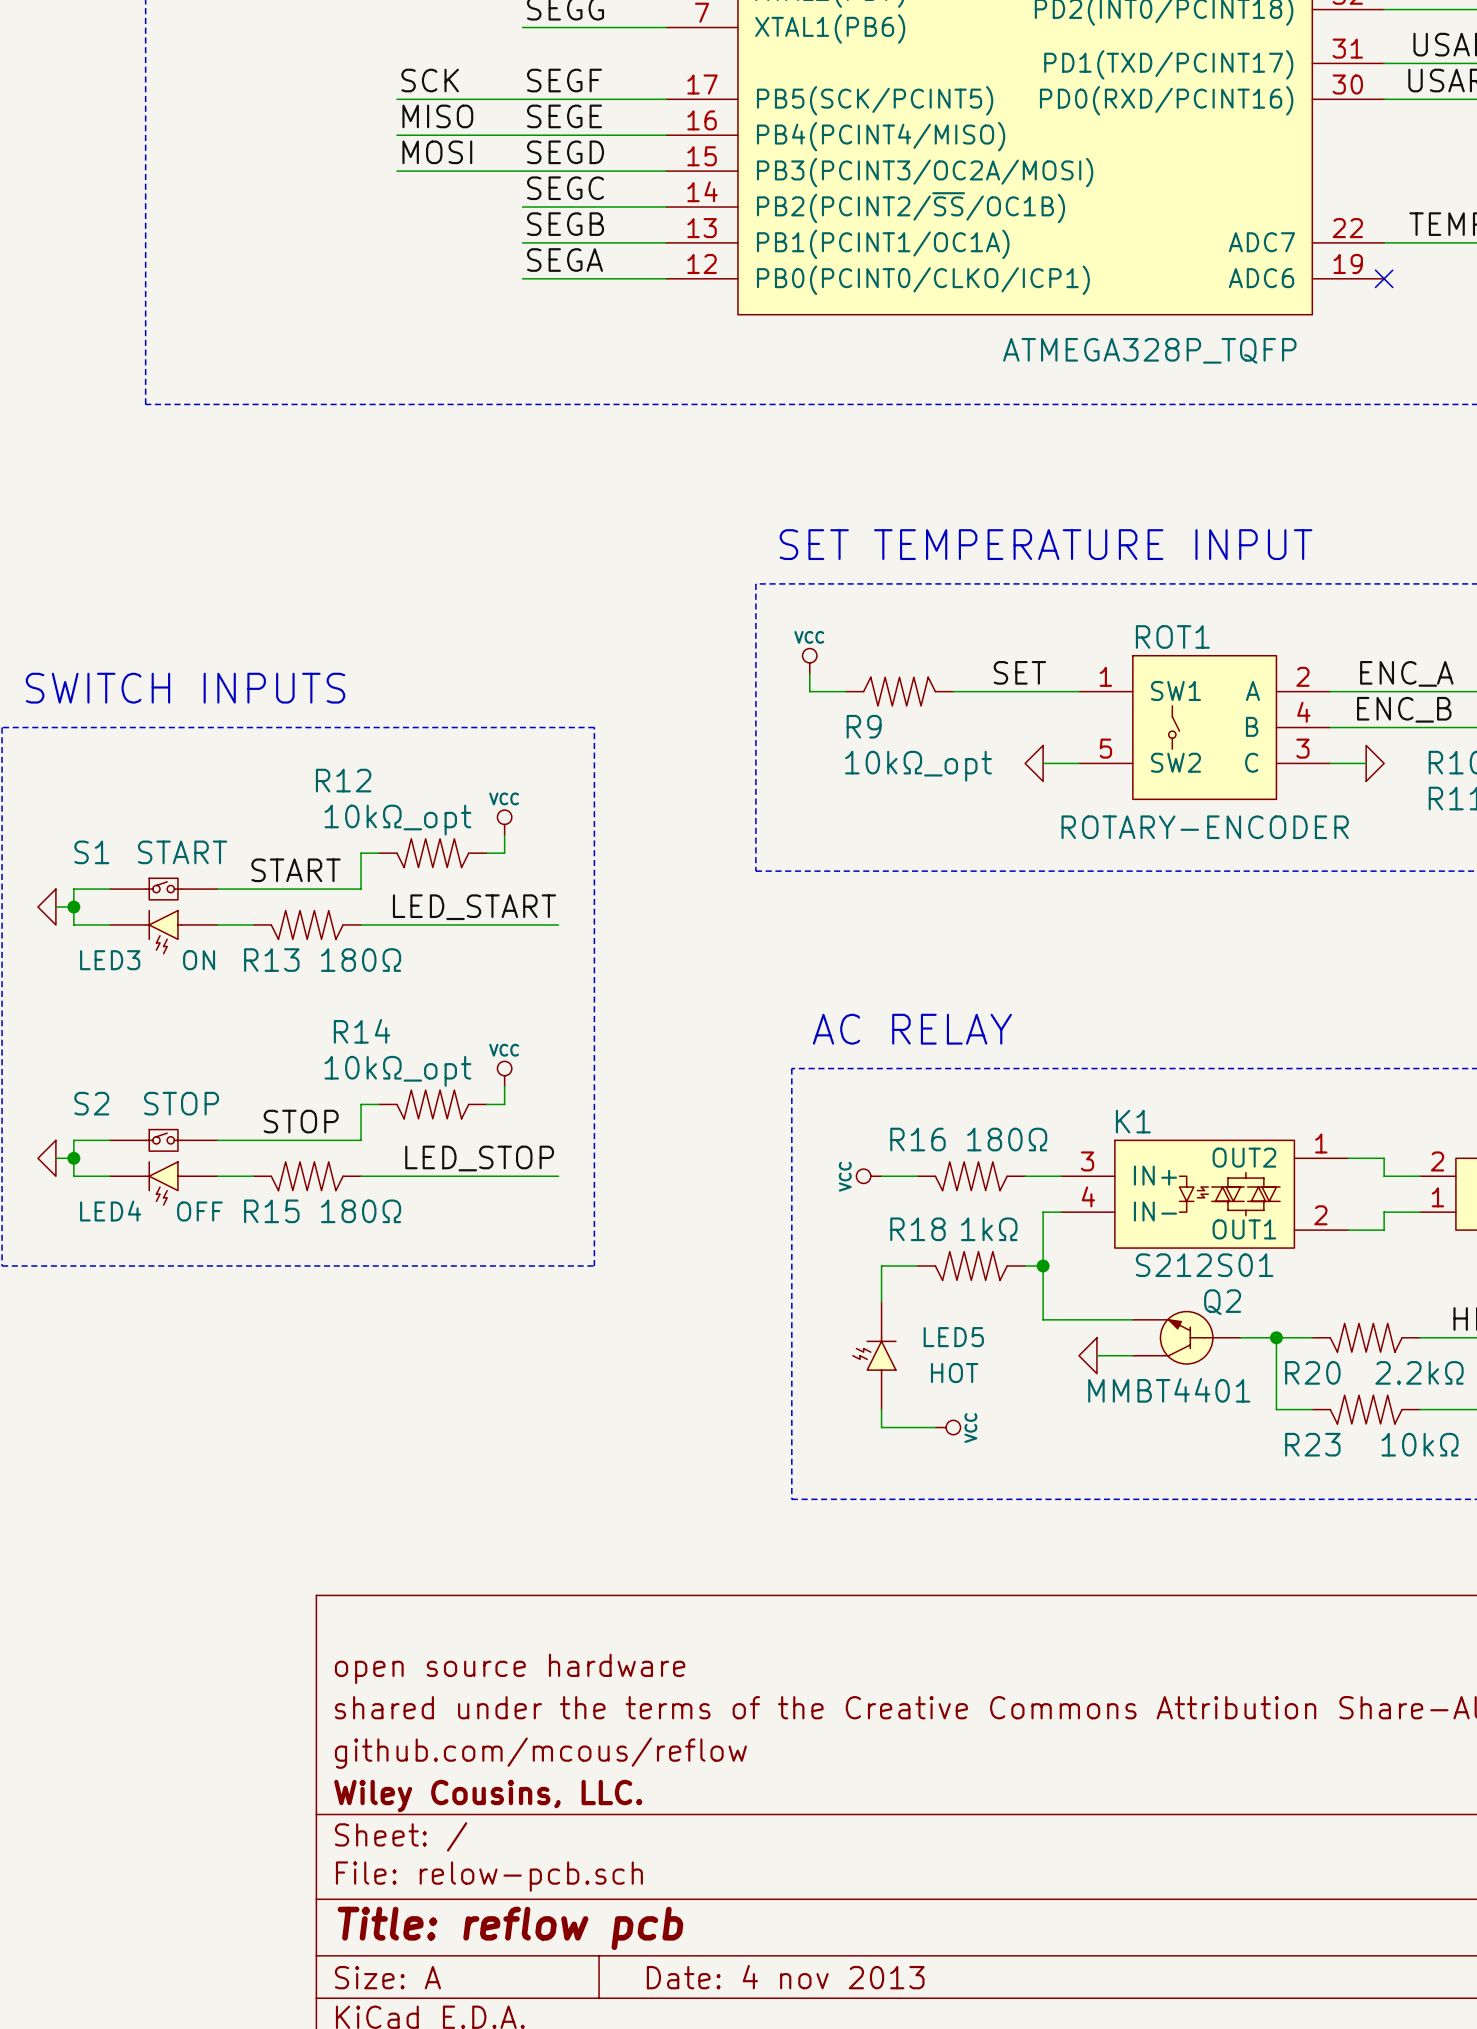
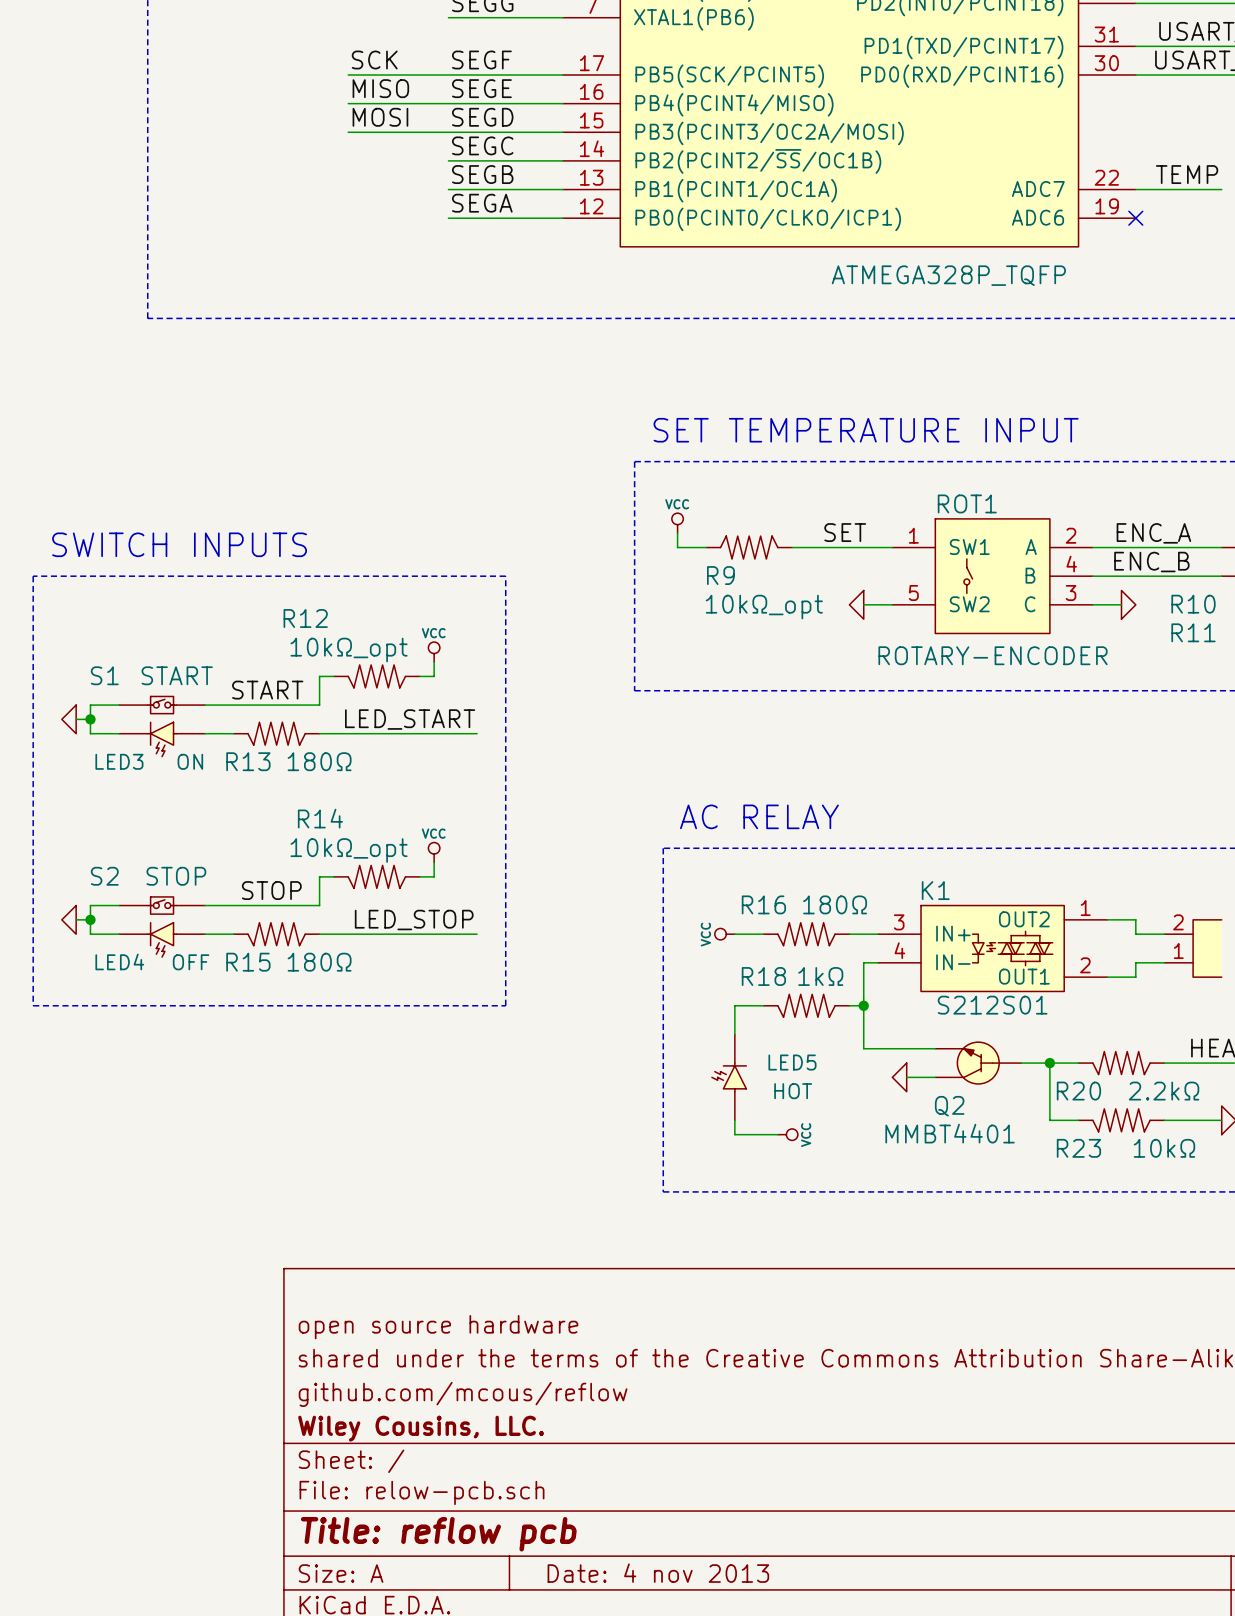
Q2 name position: Q2 (1222, 1302) -> Q2 (949, 1106)
Q2 value position: MMBT4401 (1169, 1390) -> MMBT4401 (950, 1133)

